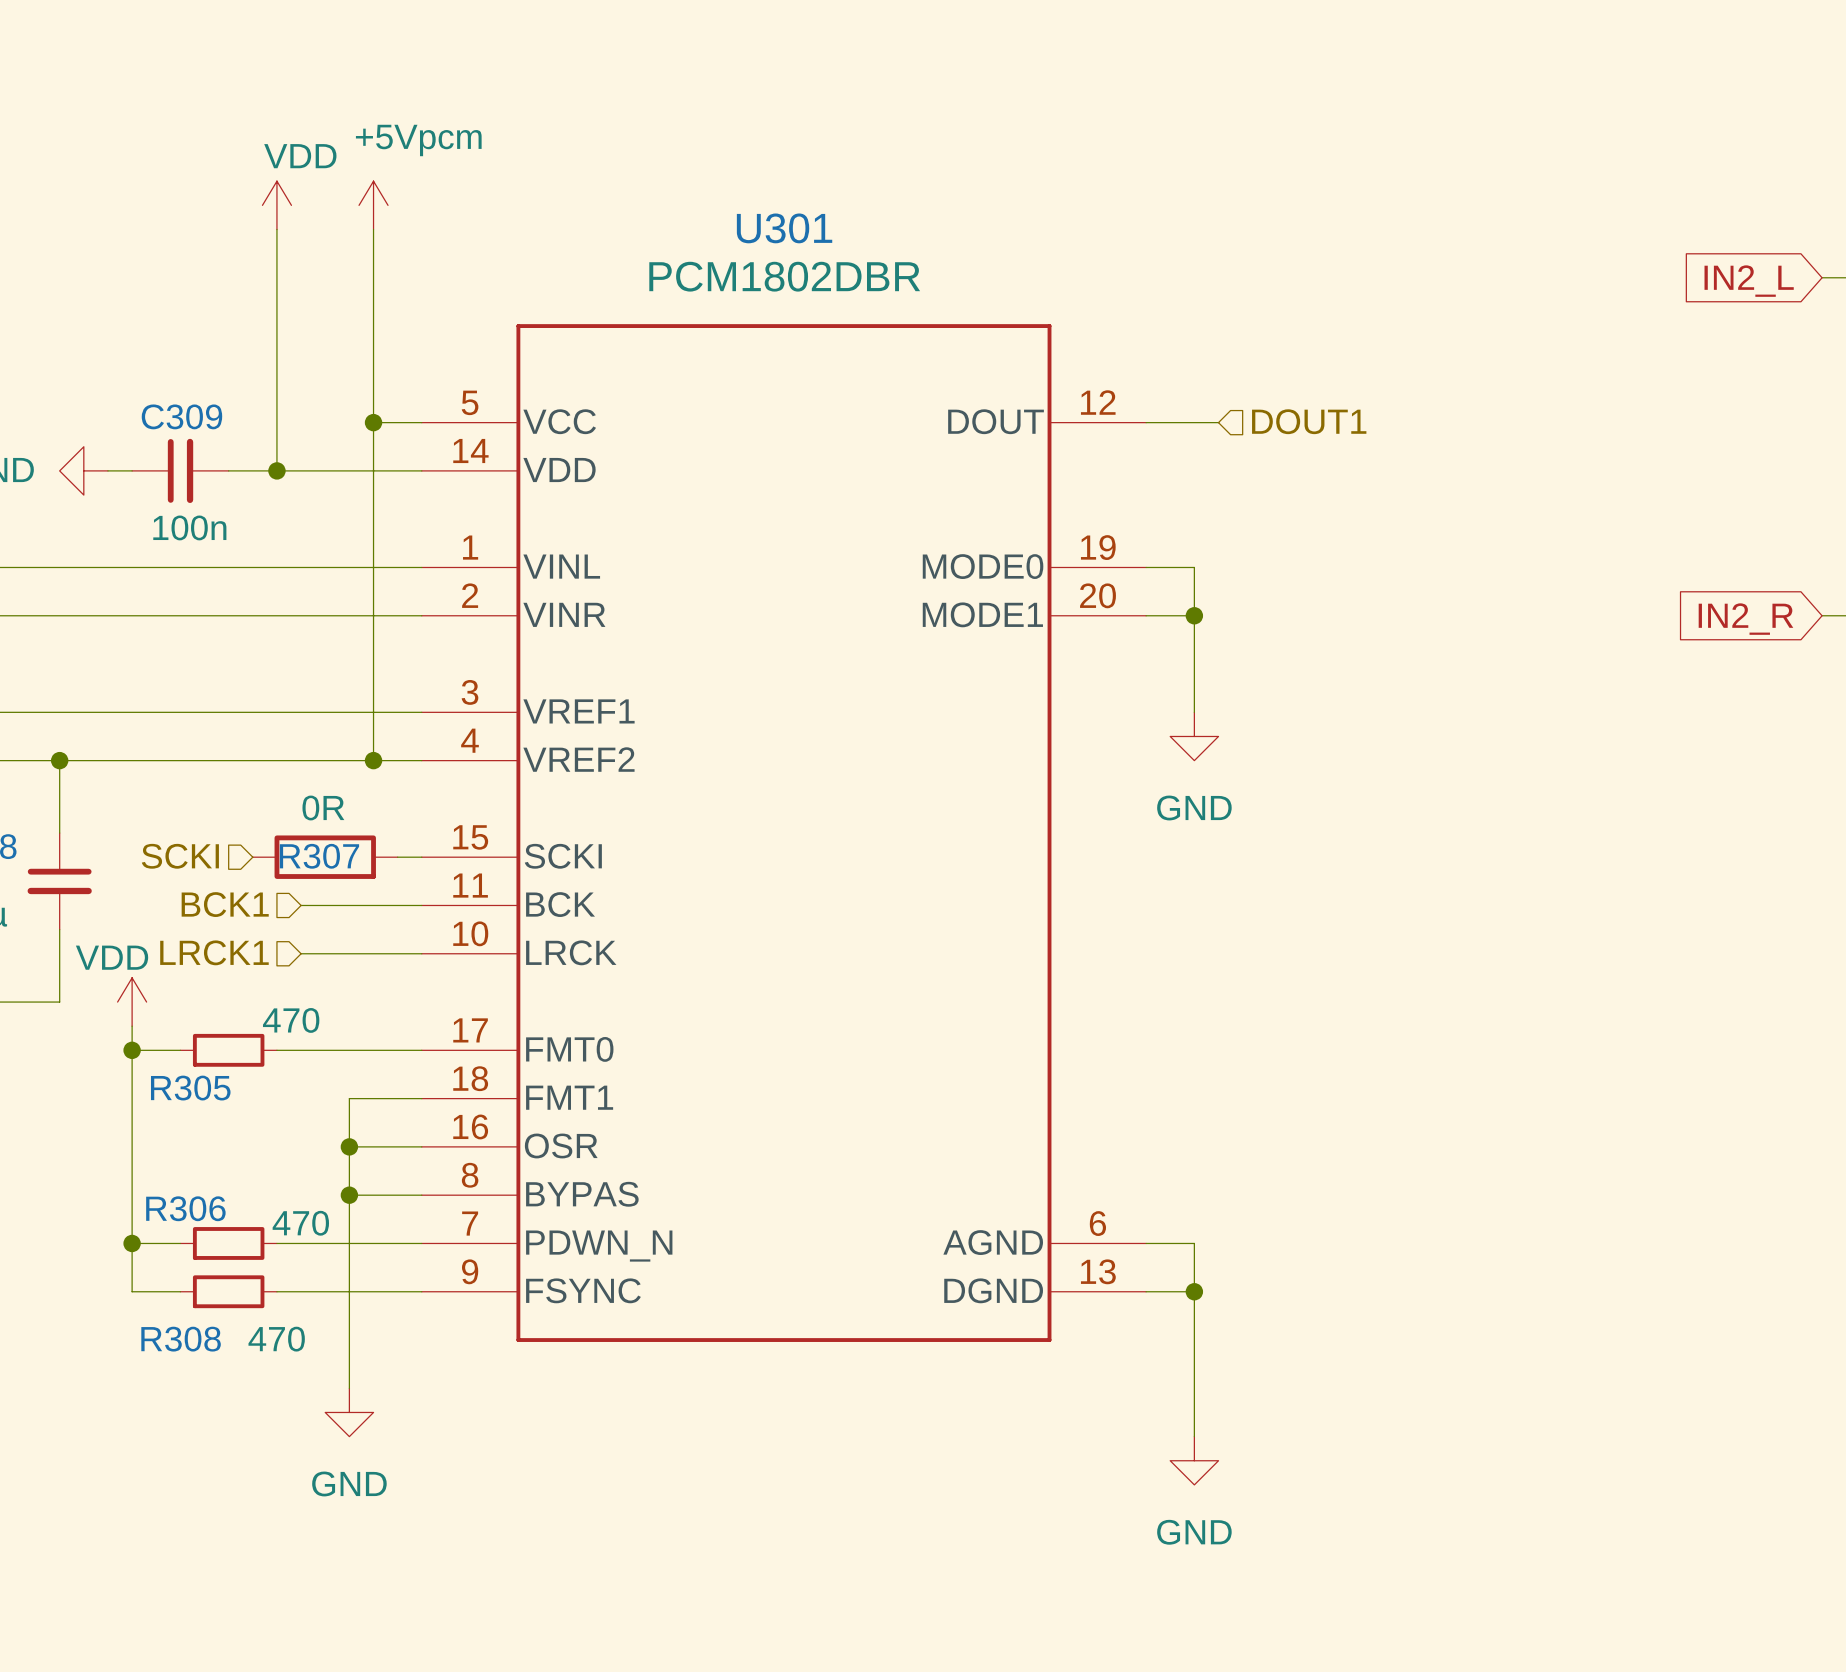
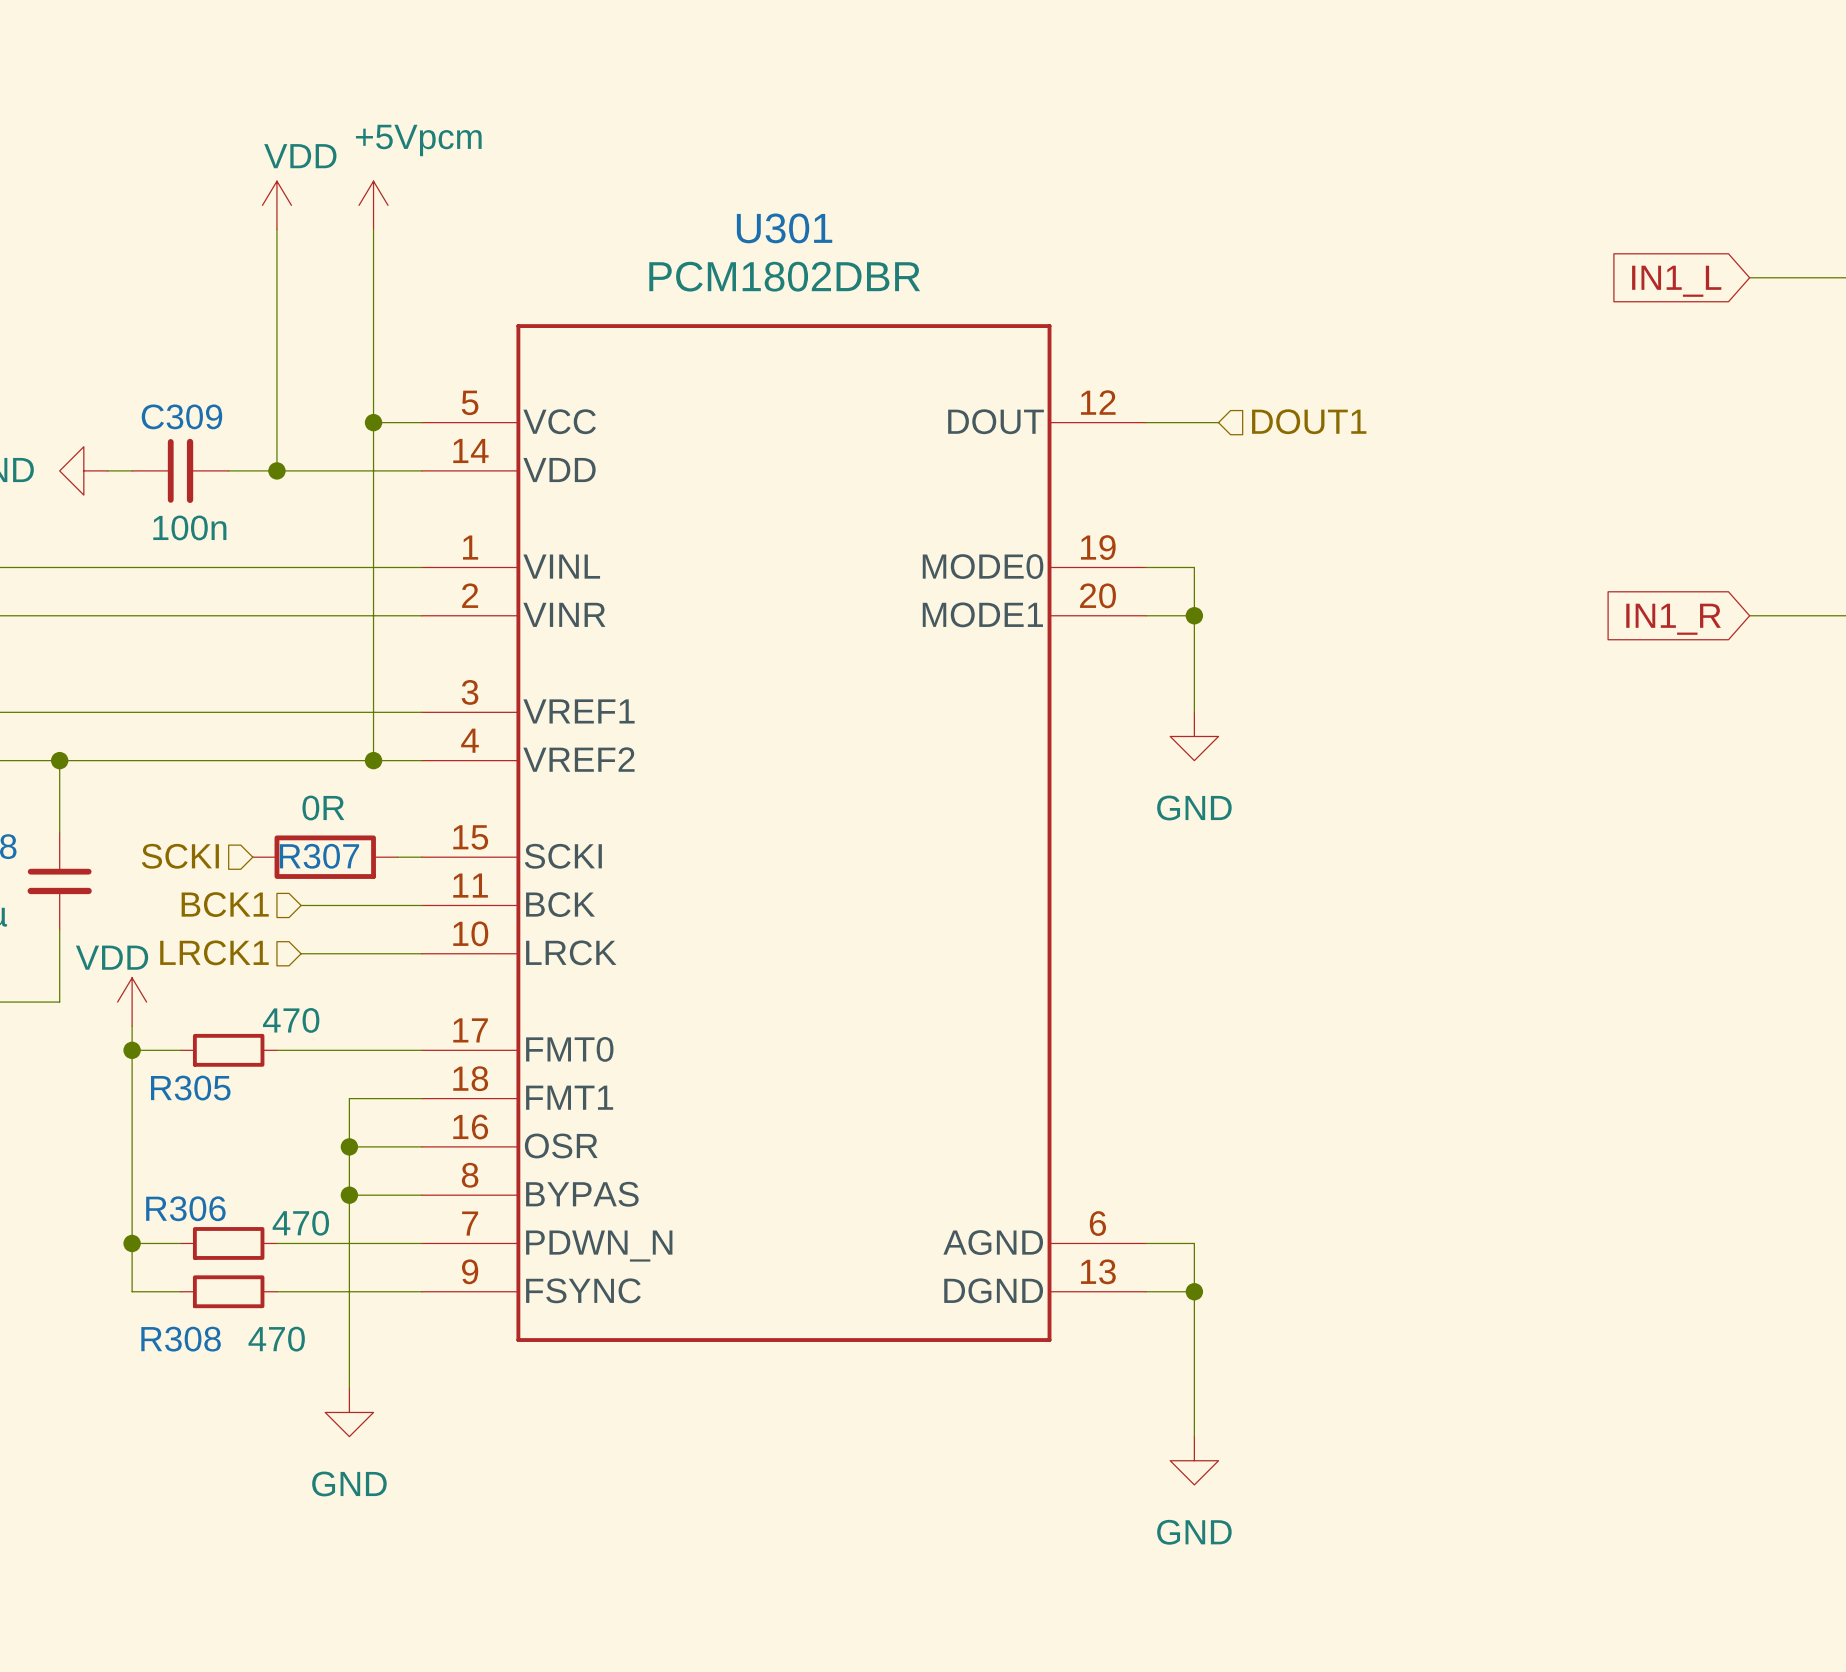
wire: none -> (1749, 277) (1822, 277)
global label: IN2_L (1749, 281) -> IN1_L (1676, 281)
wire: none -> (1749, 615) (1822, 615)
global label: IN2_R (1745, 619) -> IN1_R (1673, 619)

